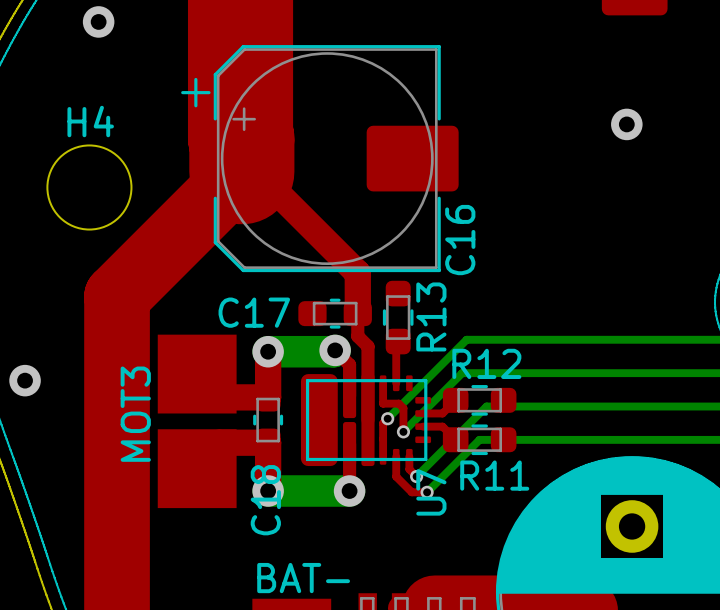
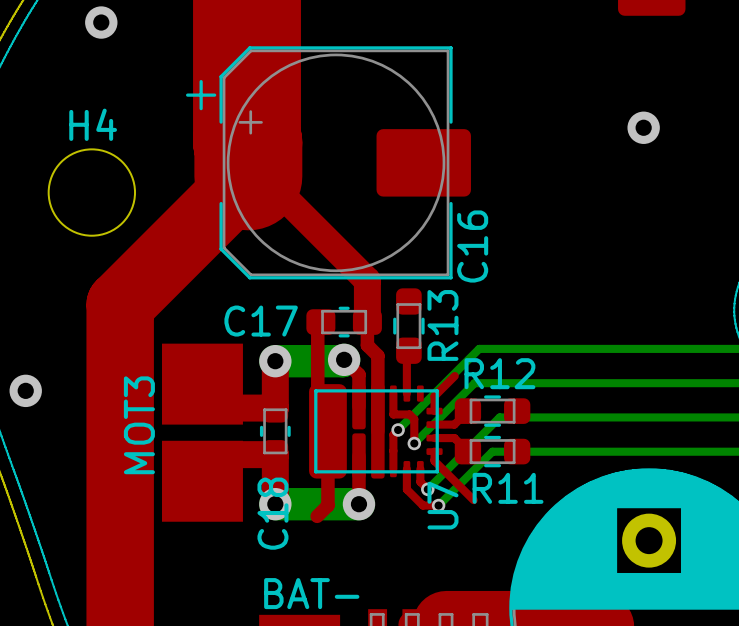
top track: none -> (320, 322) (317, 325) (317, 421) (327, 431) (327, 505) (317, 516)
top track: none -> (454, 376) (434, 396) (434, 411)
top track: none -> (434, 451) (434, 461) (473, 500)

